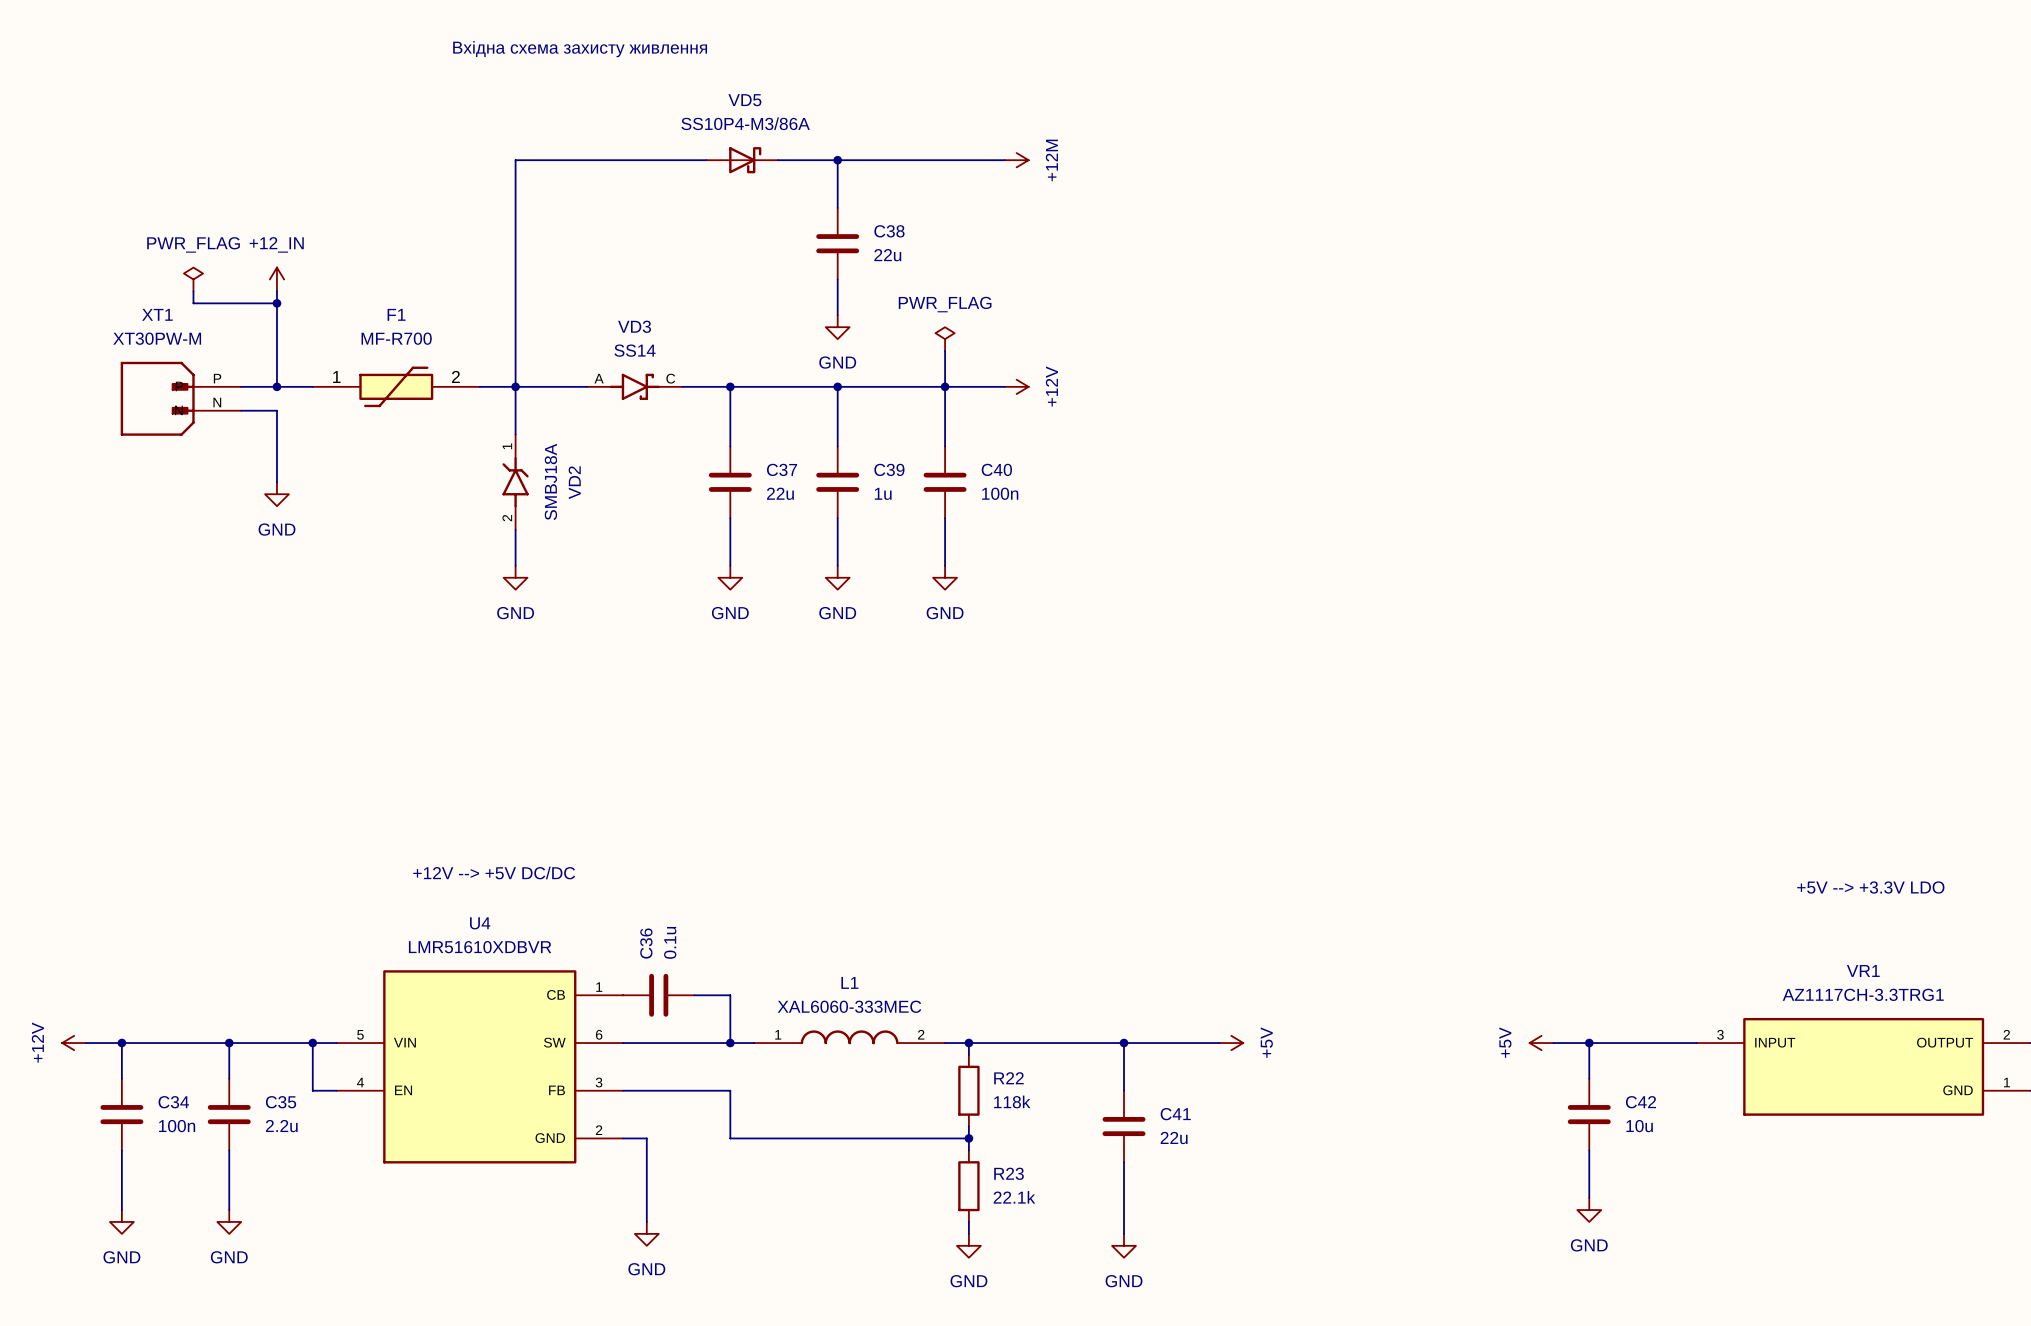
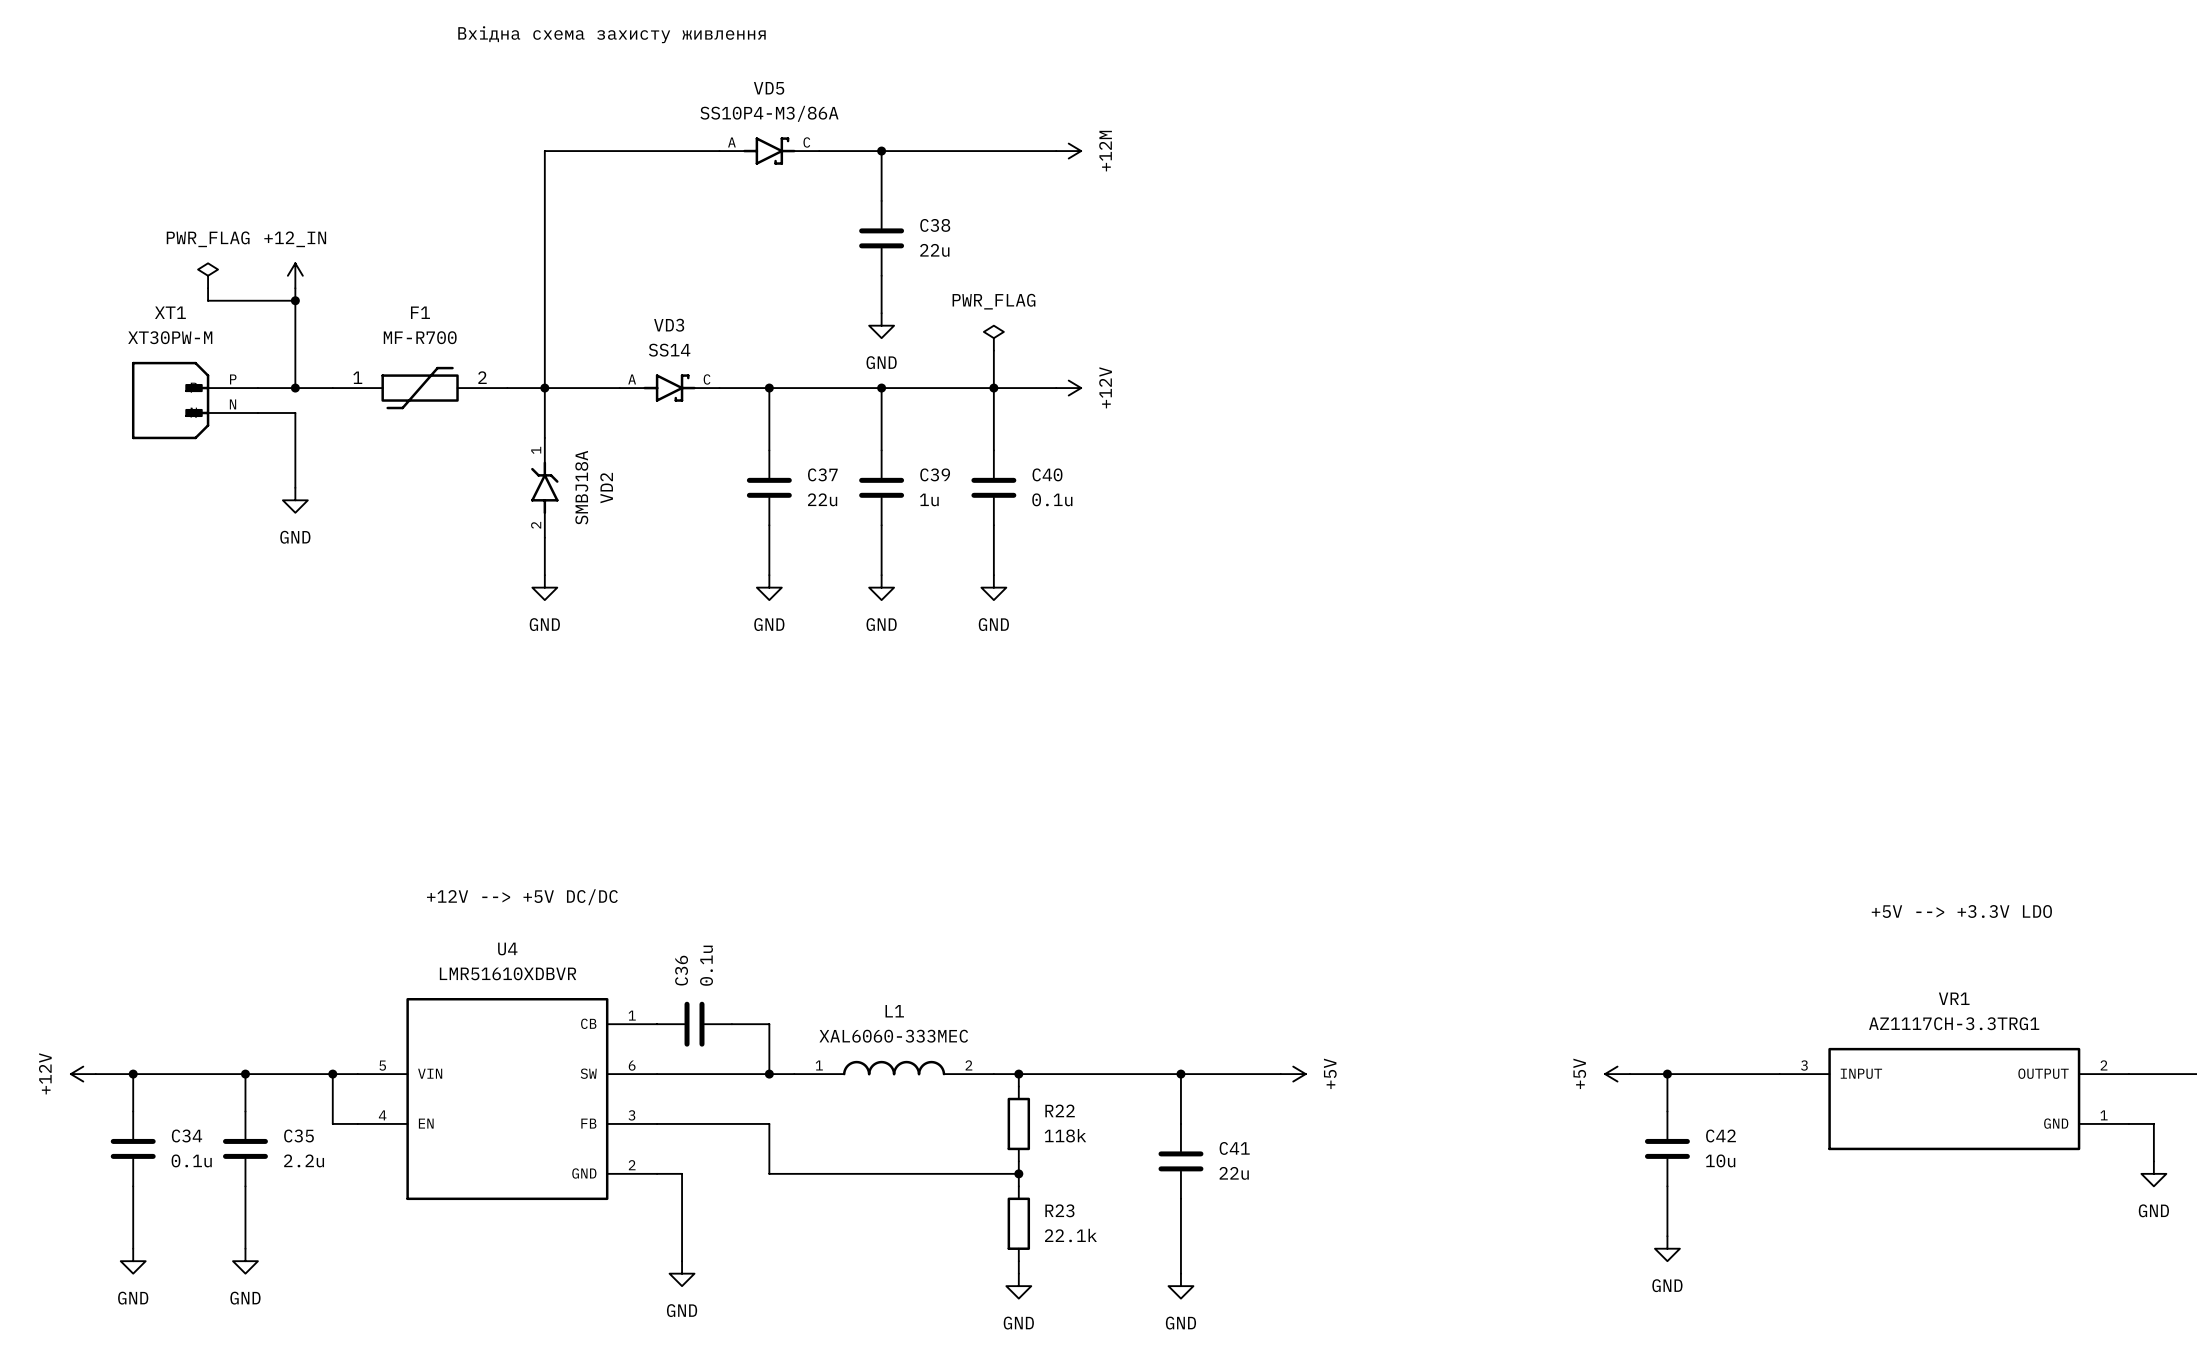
VD5 symbol: [706, 147, 779, 174] -> [719, 137, 820, 165]
C40 value: 100n (1000, 493) -> 0.1u (1052, 499)
C34 value: 100n (177, 1126) -> 0.1u (191, 1160)

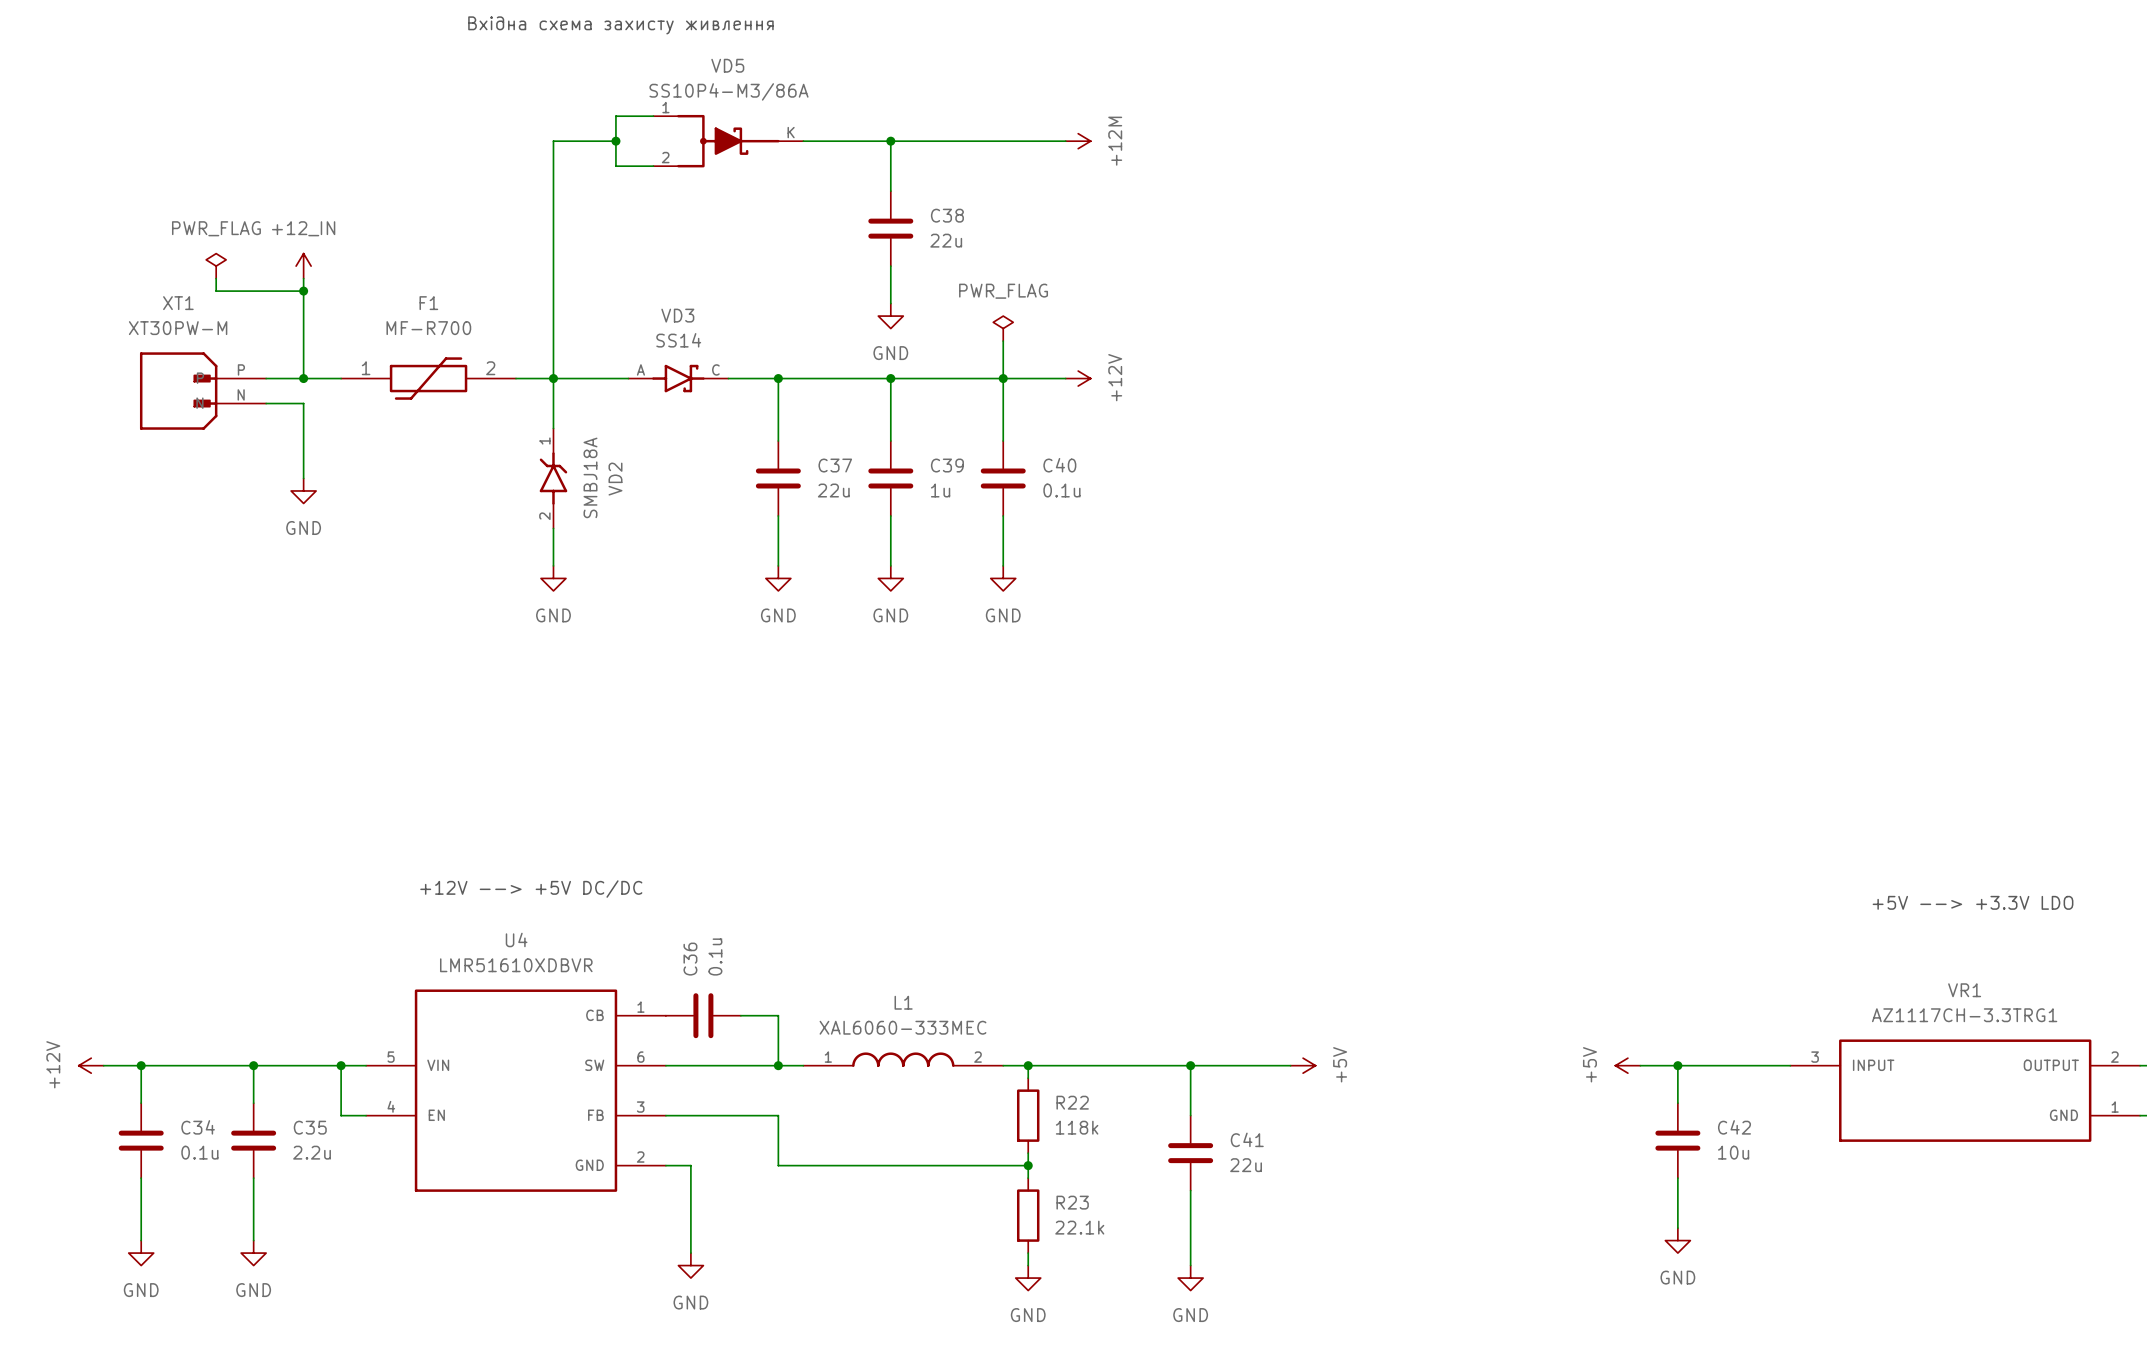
wire: none -> (653, 116) (615, 116) (615, 166) (653, 166)
VD5 symbol: [719, 137, 820, 165] -> [653, 114, 804, 168]
wire: (607, 151) (719, 151) -> none
junction: none -> (615, 141)

